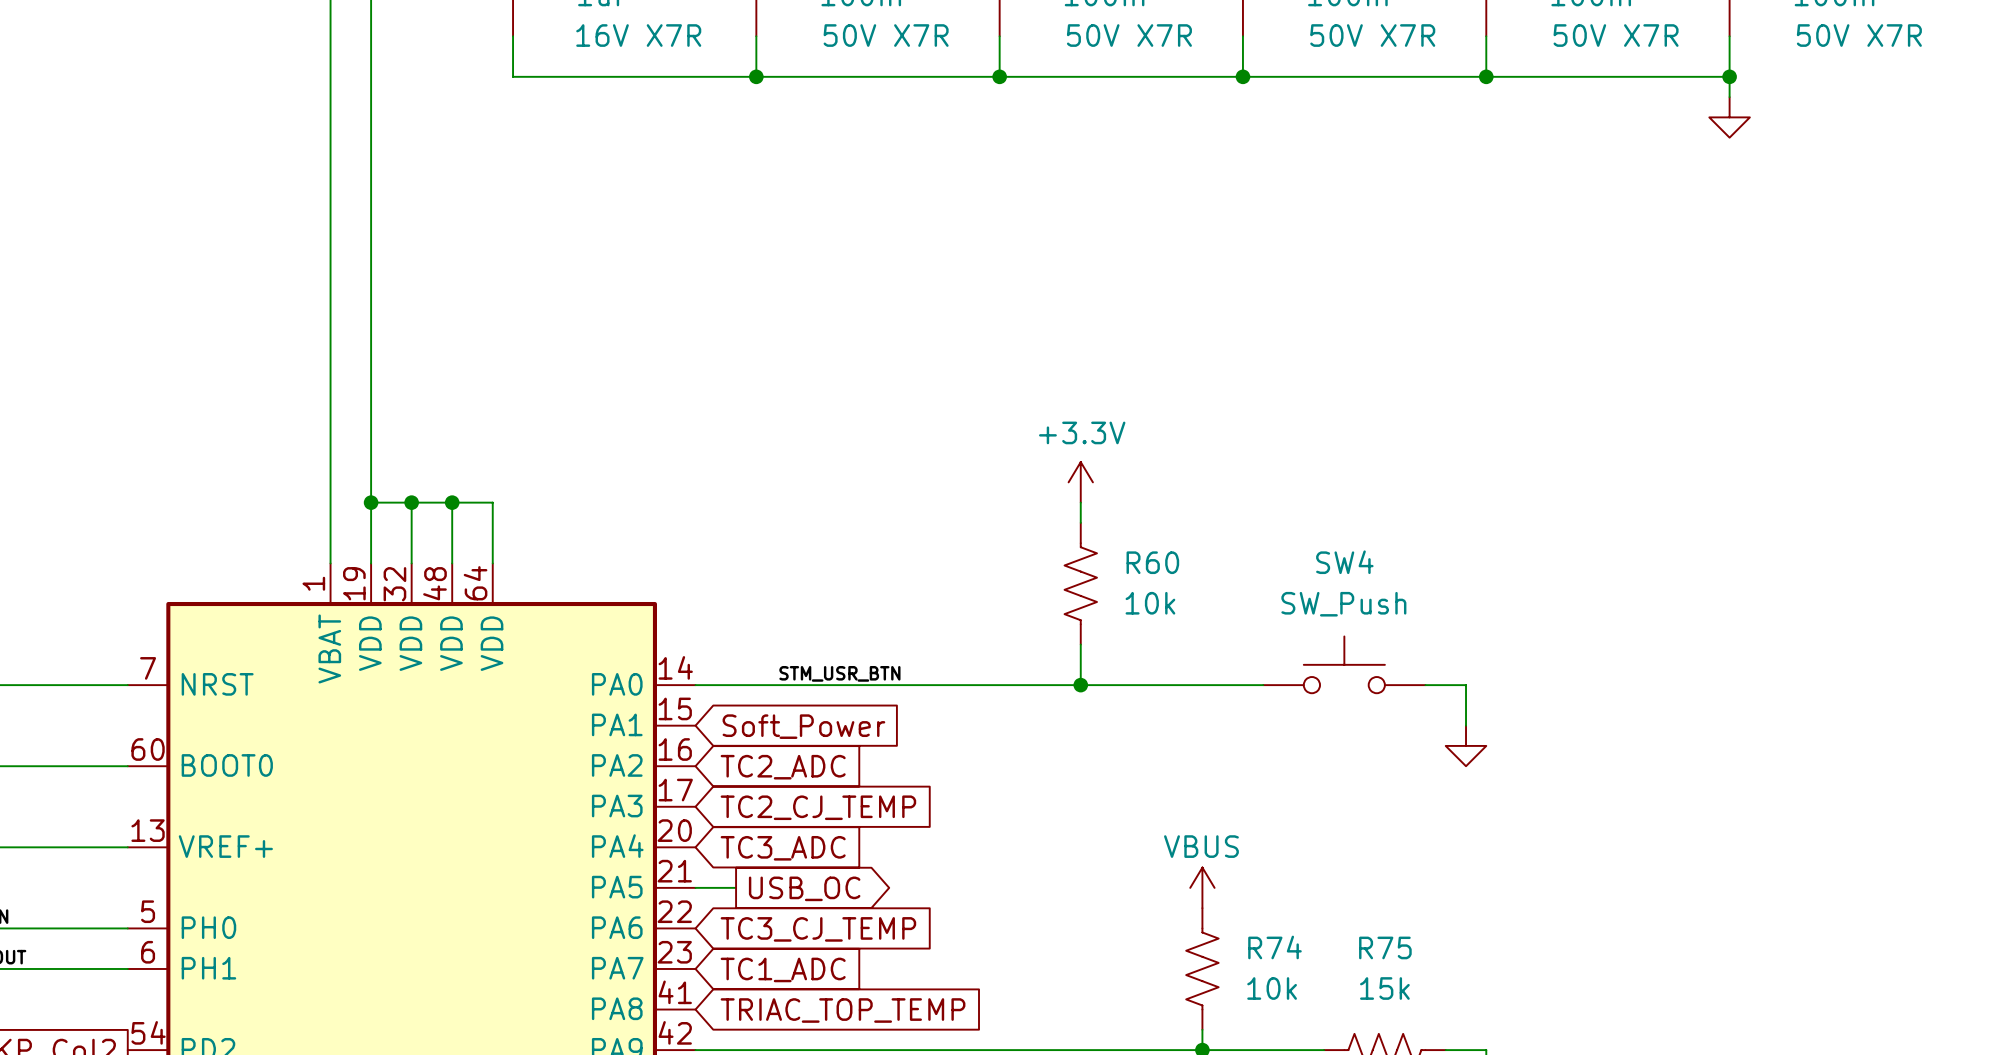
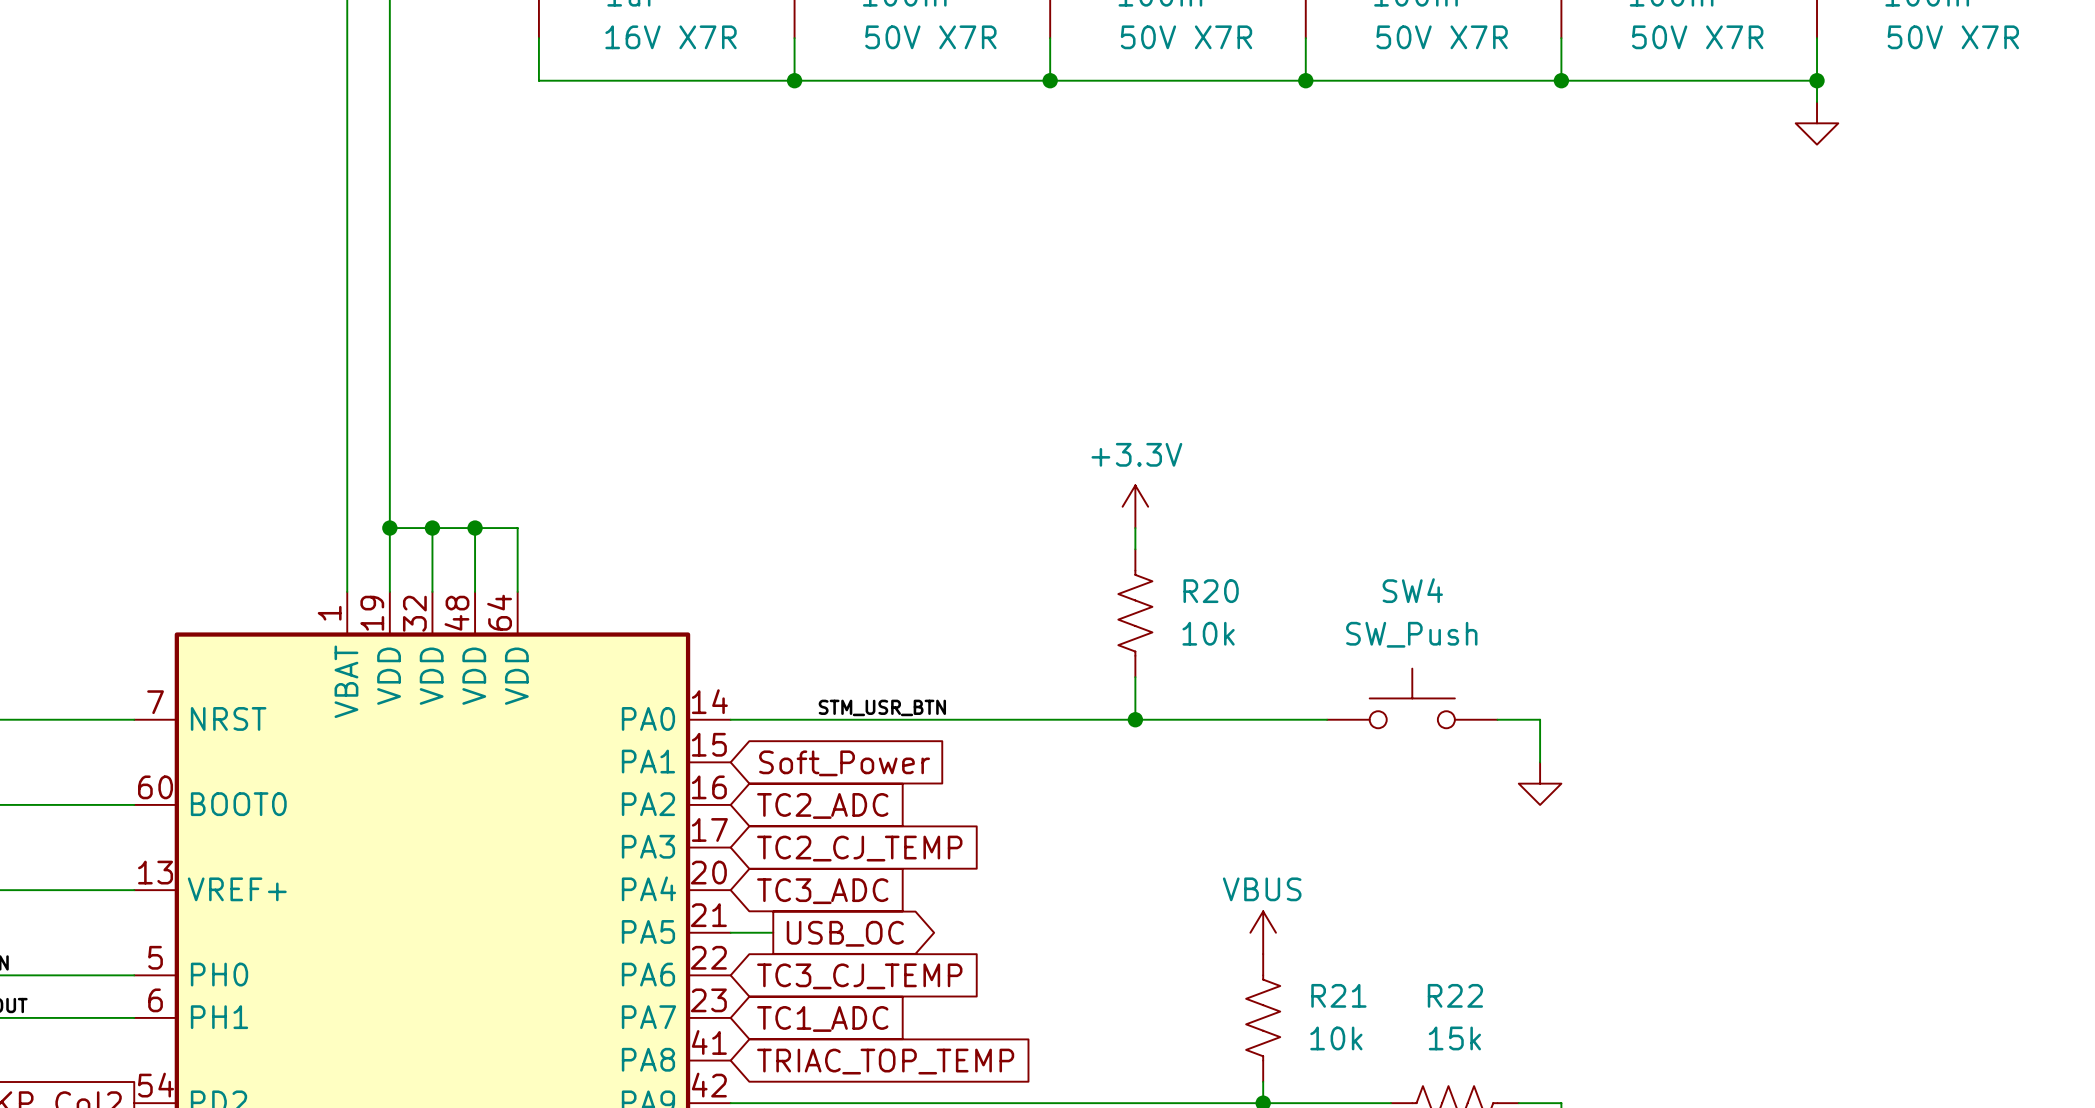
R60 name: R60 (1152, 562) -> R20 (1211, 591)
R74 name: R74 (1274, 947) -> R21 (1338, 995)
R75 name: R75 (1385, 947) -> R22 (1455, 995)

